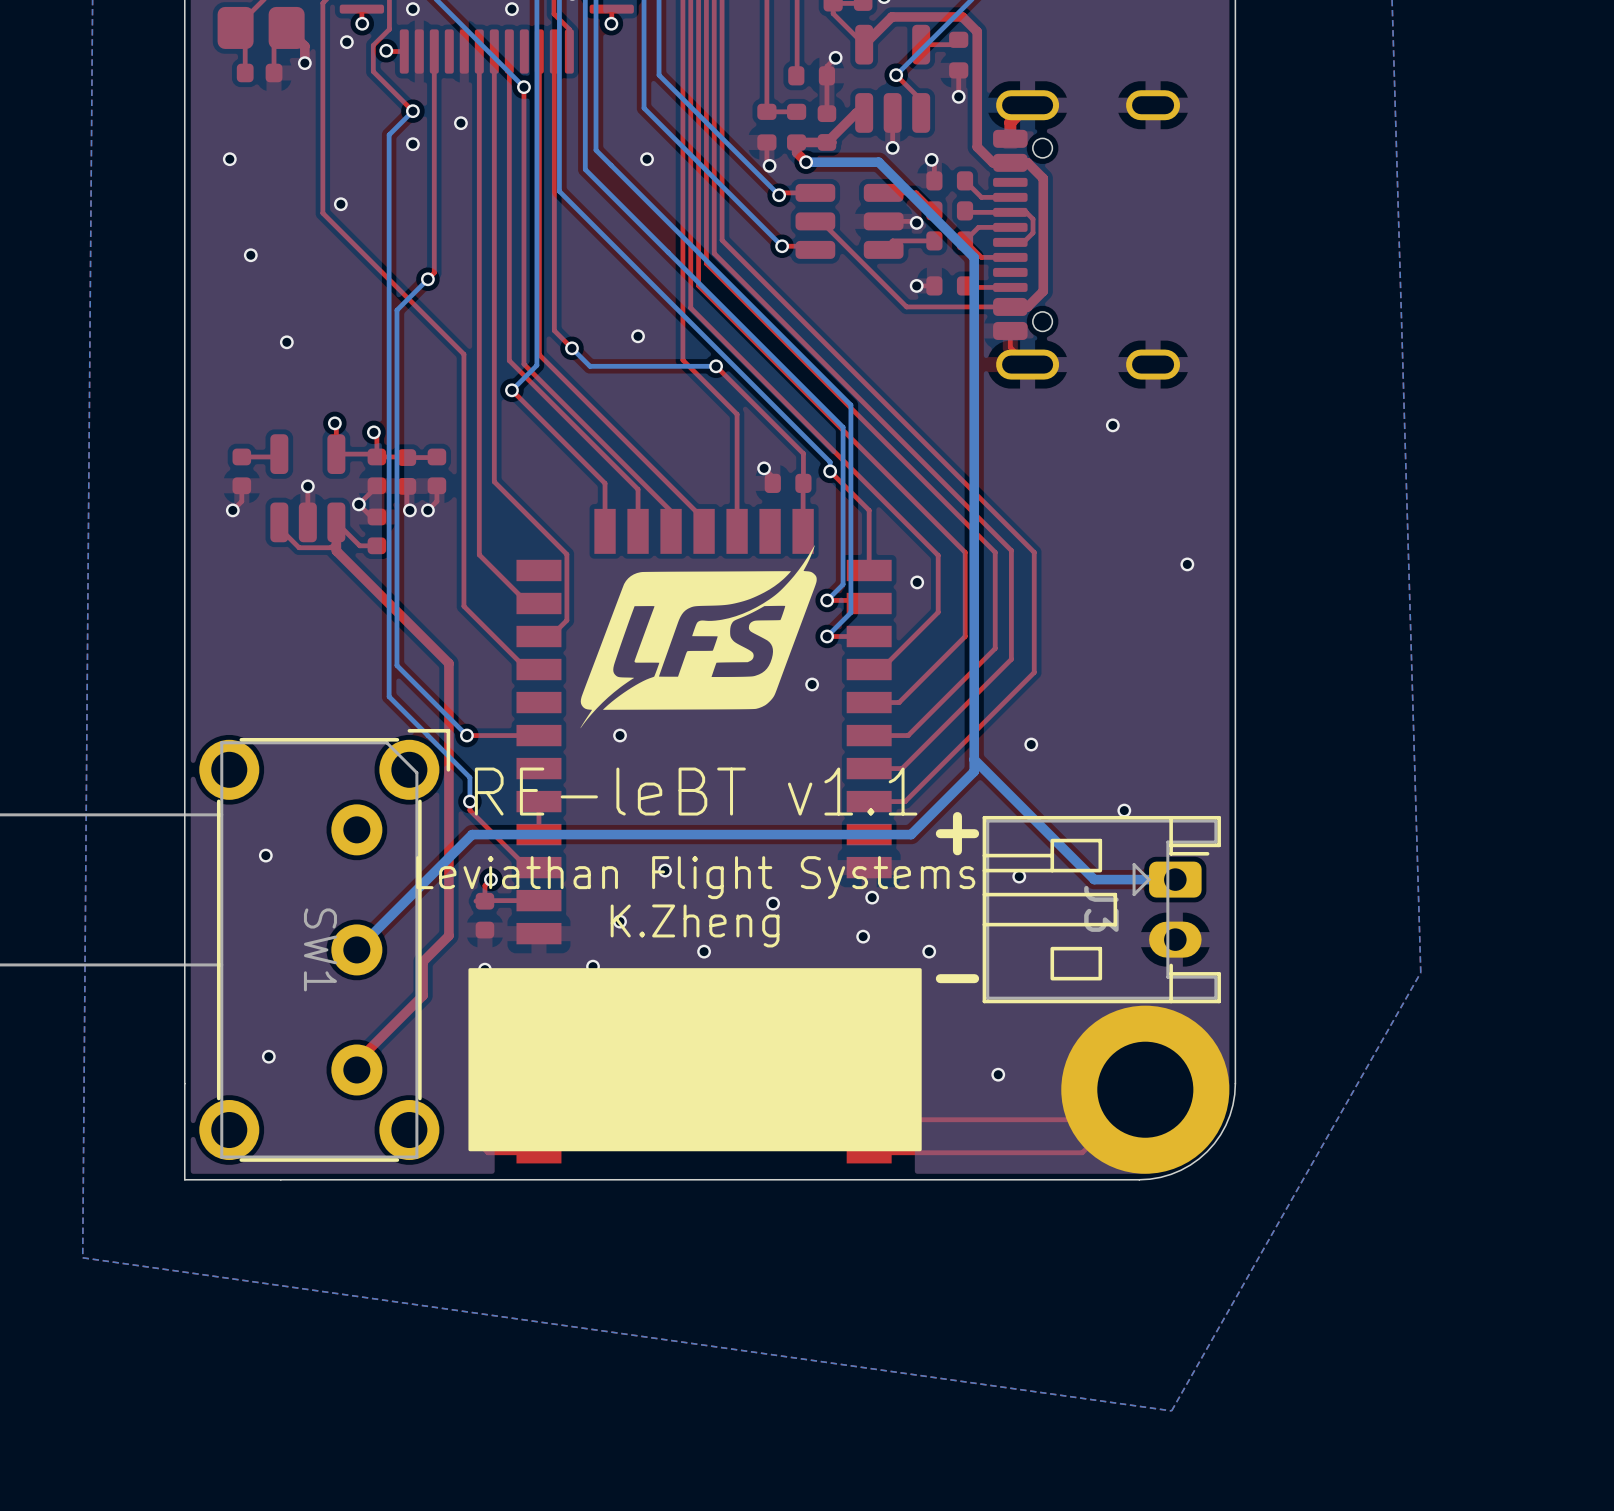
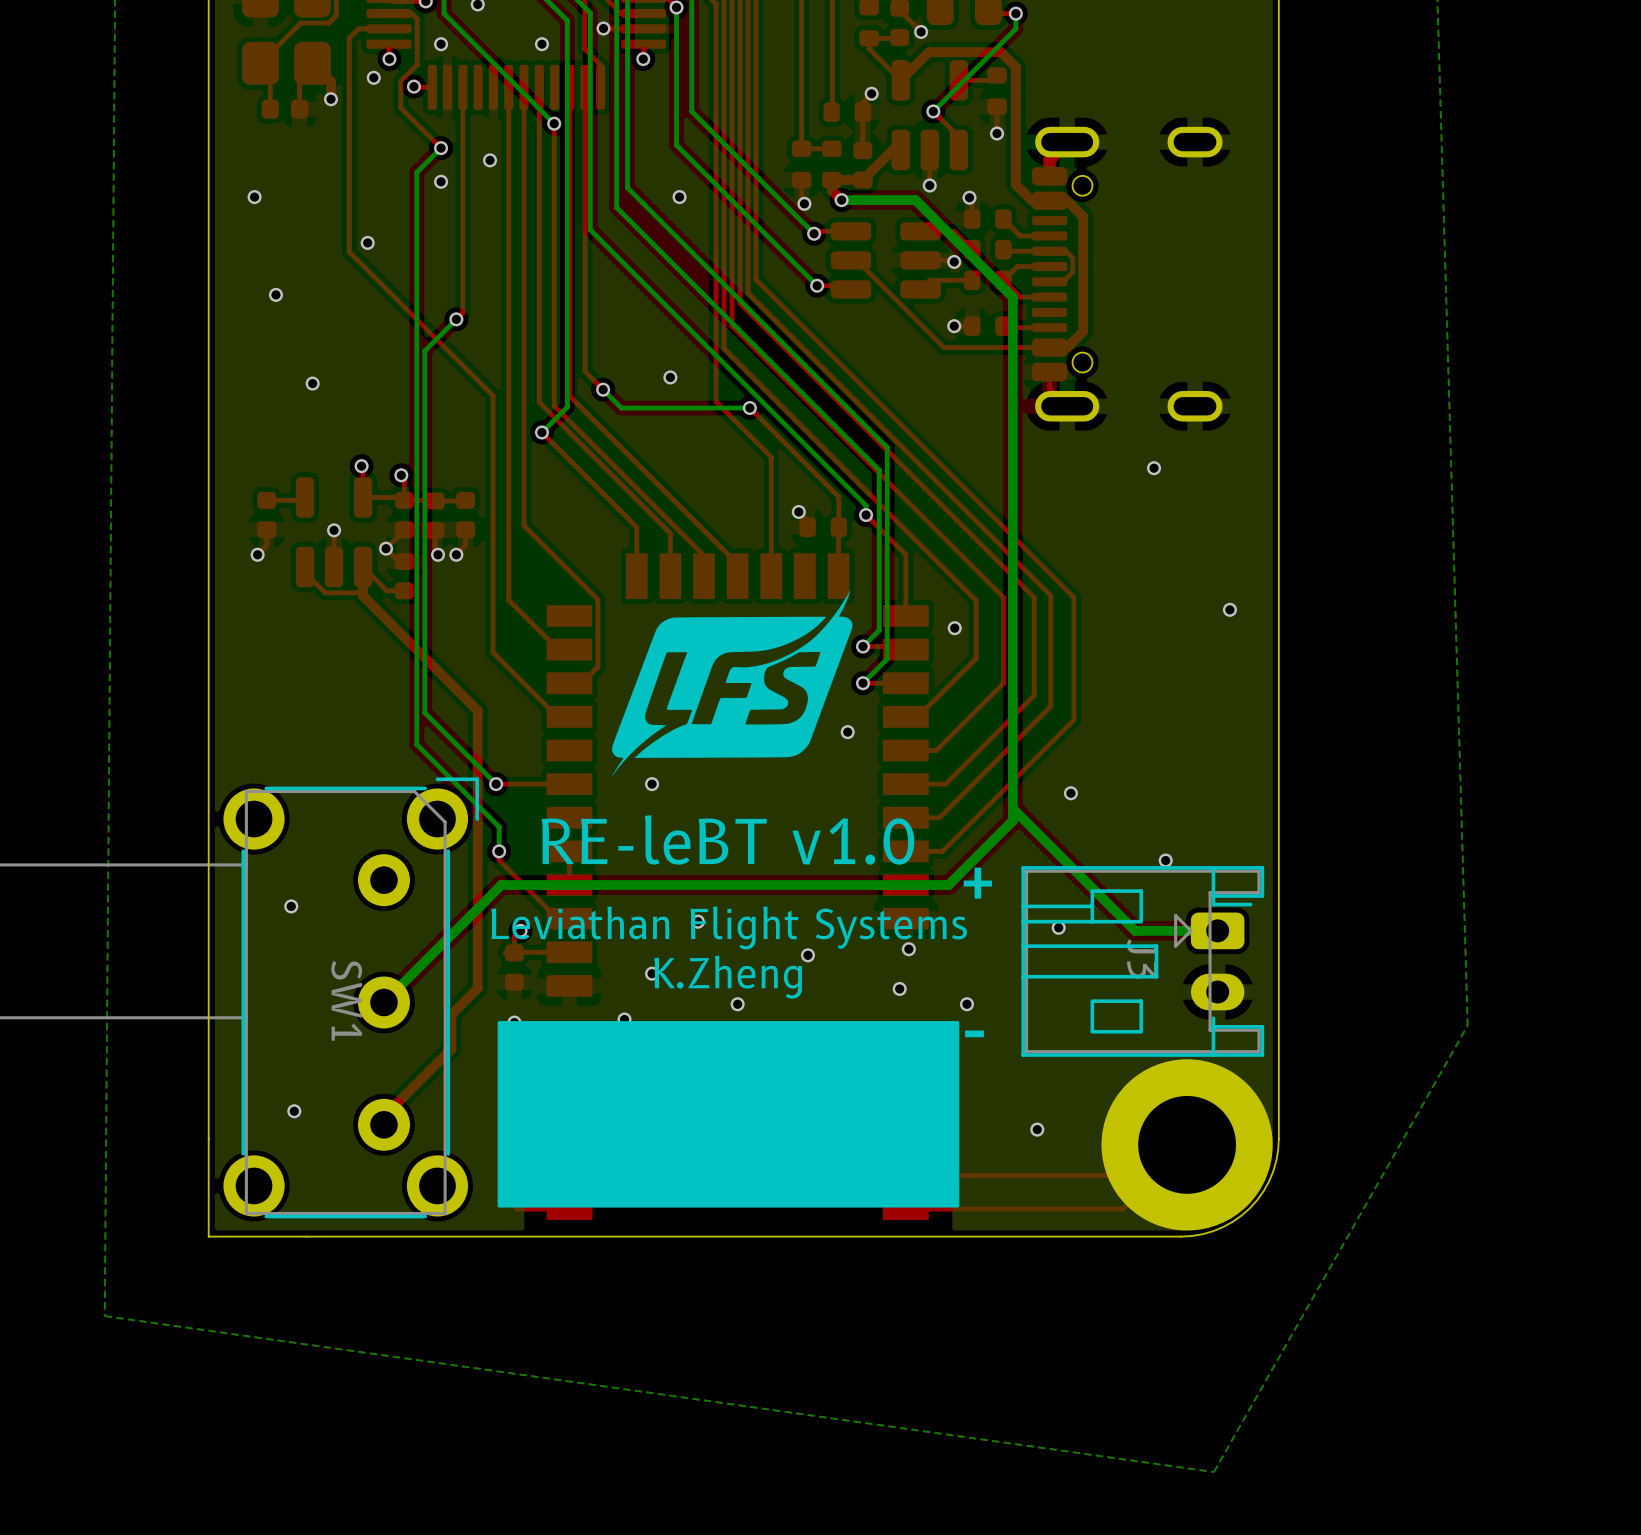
text: RE-leBT v1.1 (696, 791) -> RE-leBT v1.0 (727, 839)

